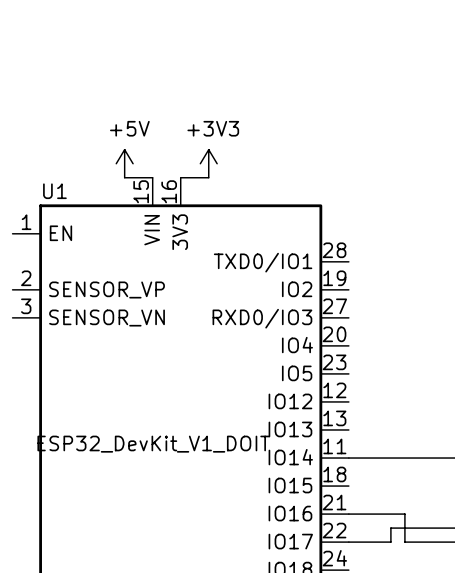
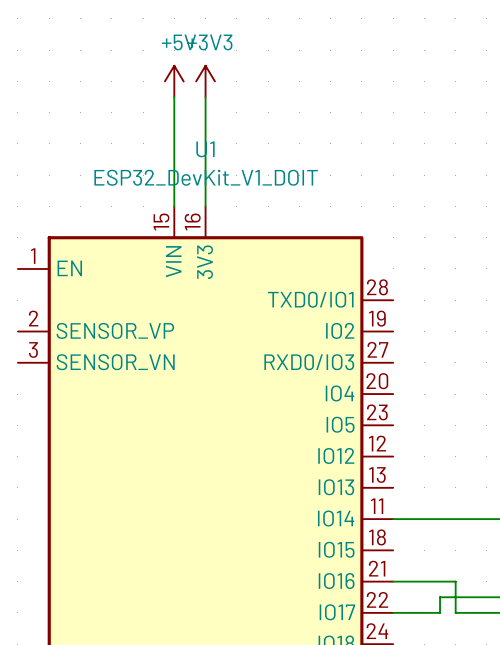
power symbol position: +5V (124, 163) -> +5V (174, 81)
power symbol position: +3V3 (208, 163) -> +3V3 (205, 81)
wire: (124, 177) (152, 177) -> (174, 97) (174, 206)
wire: (180, 177) (208, 177) -> (205, 206) (205, 97)
U1 name position: U1 (54, 191) -> U1 (205, 149)
U1 value position: ESP32_DevKit_V1_DOIT (153, 444) -> ESP32_DevKit_V1_DOIT (206, 177)

